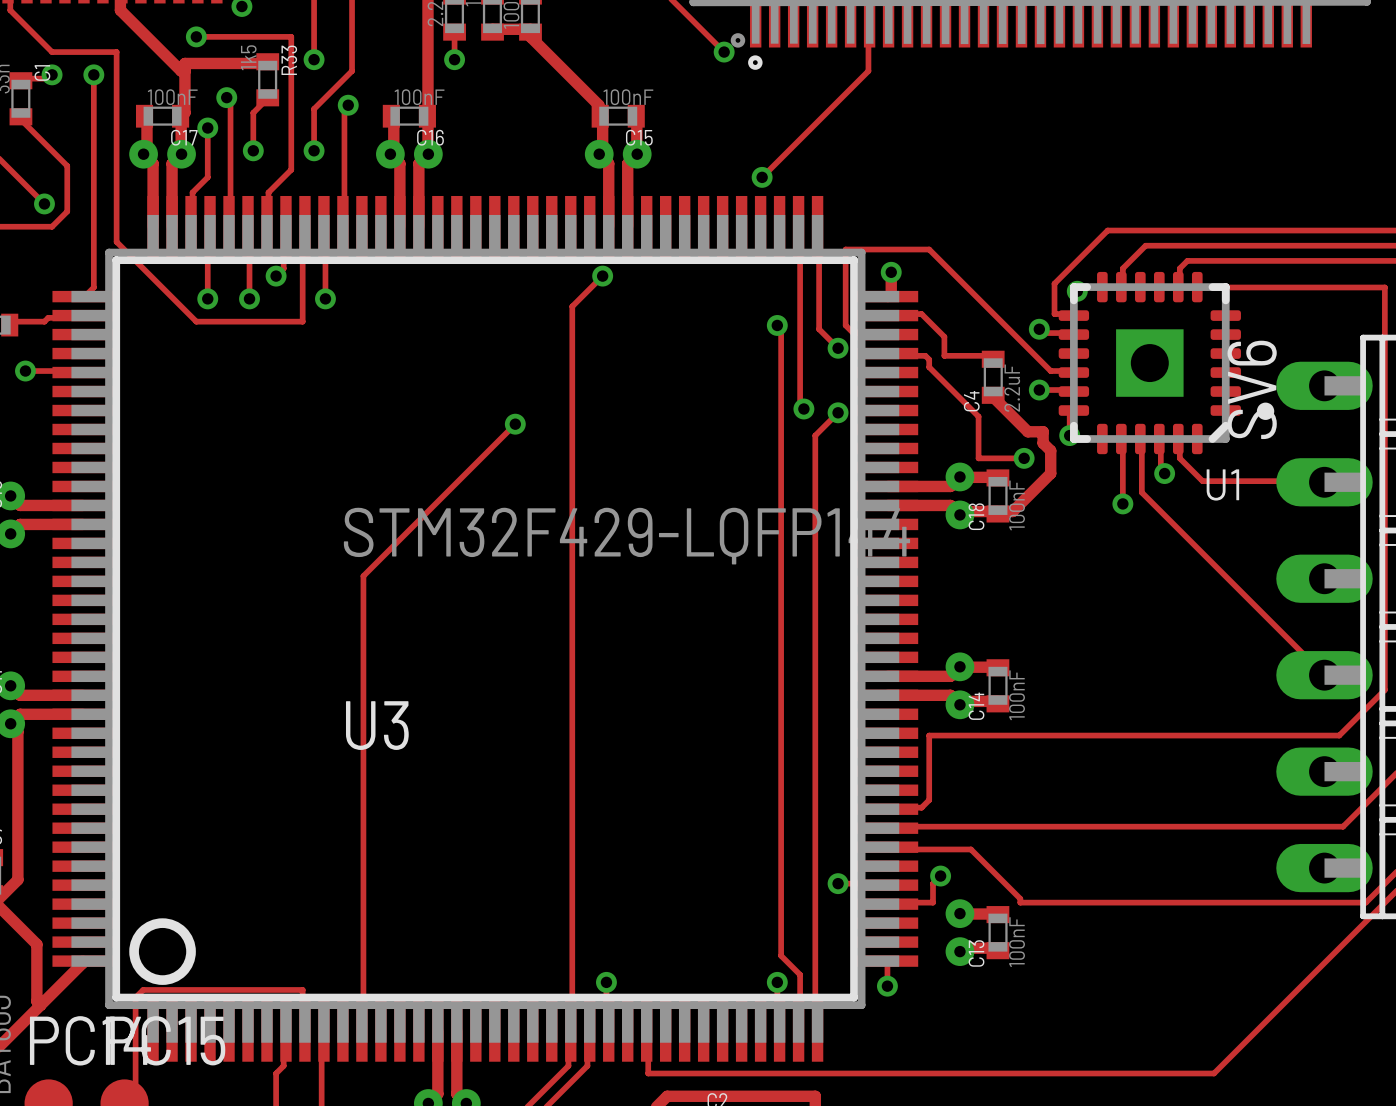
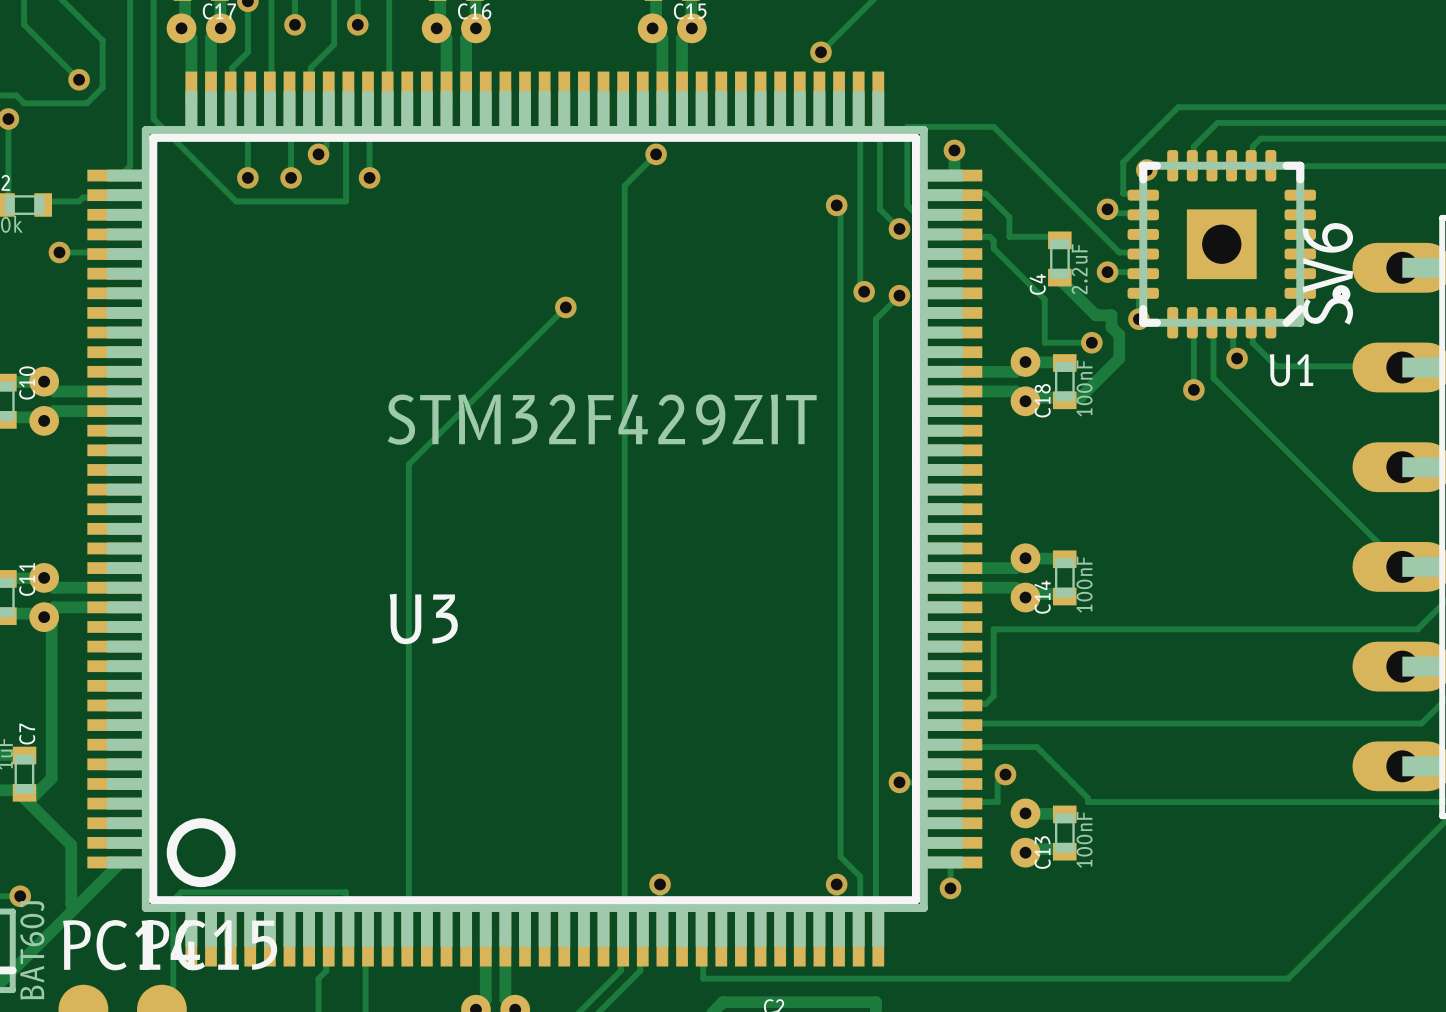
U3 footprint: [52, 195, 919, 1062] -> [87, 71, 983, 967]
U3 value: STM32F429-LQFP144 (626, 536) -> STM32F429ZIT (602, 419)

